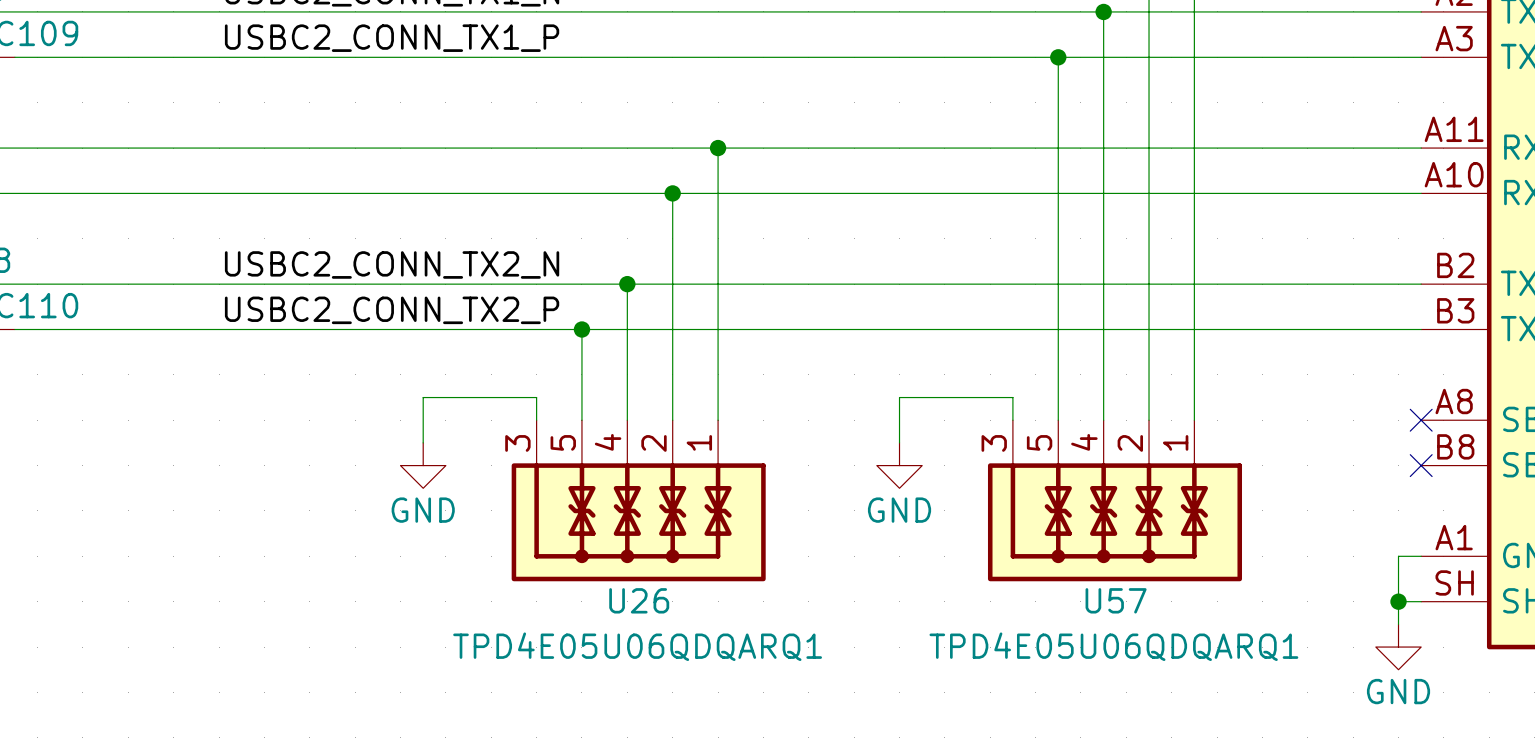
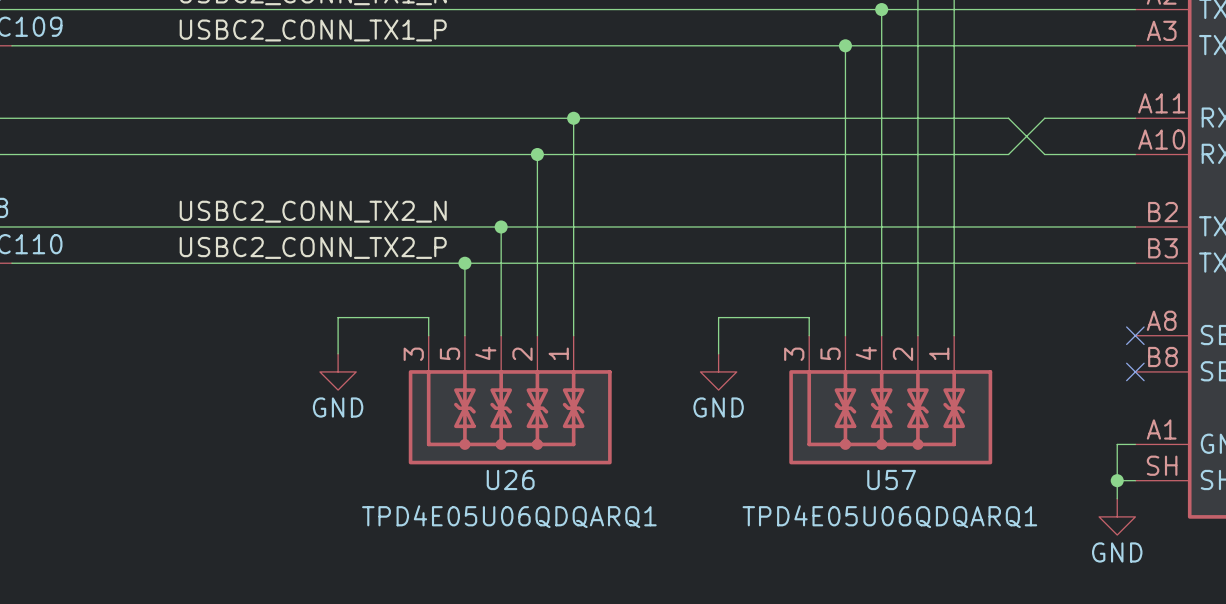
wire: (1262, 148) (1307, 148) -> (1008, 118) (1044, 154)
wire: (1262, 193) (1307, 193) -> (1008, 154) (1044, 118)

